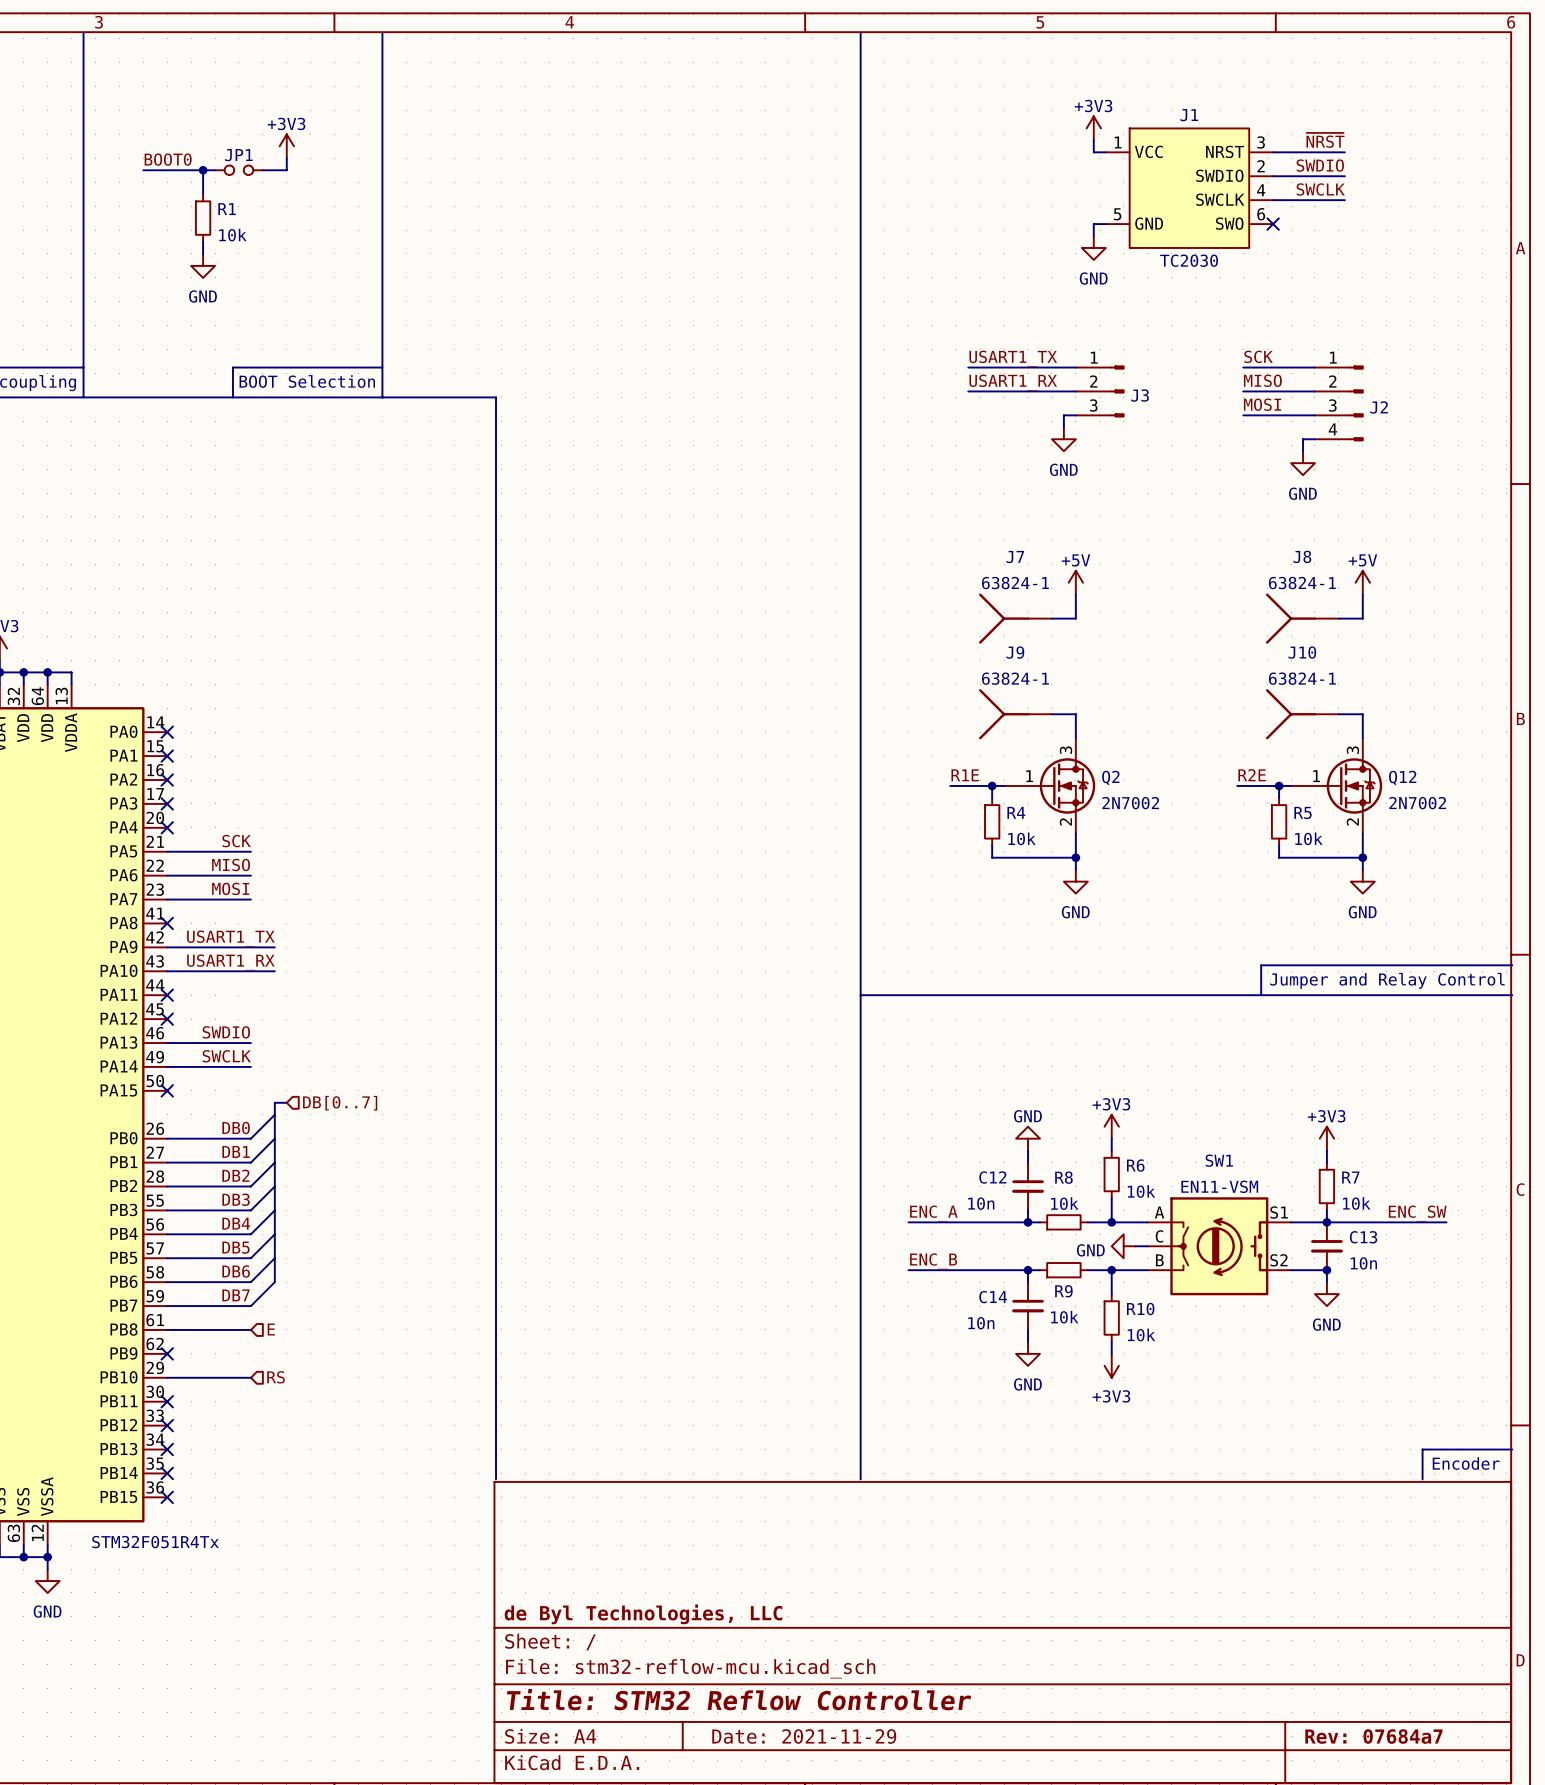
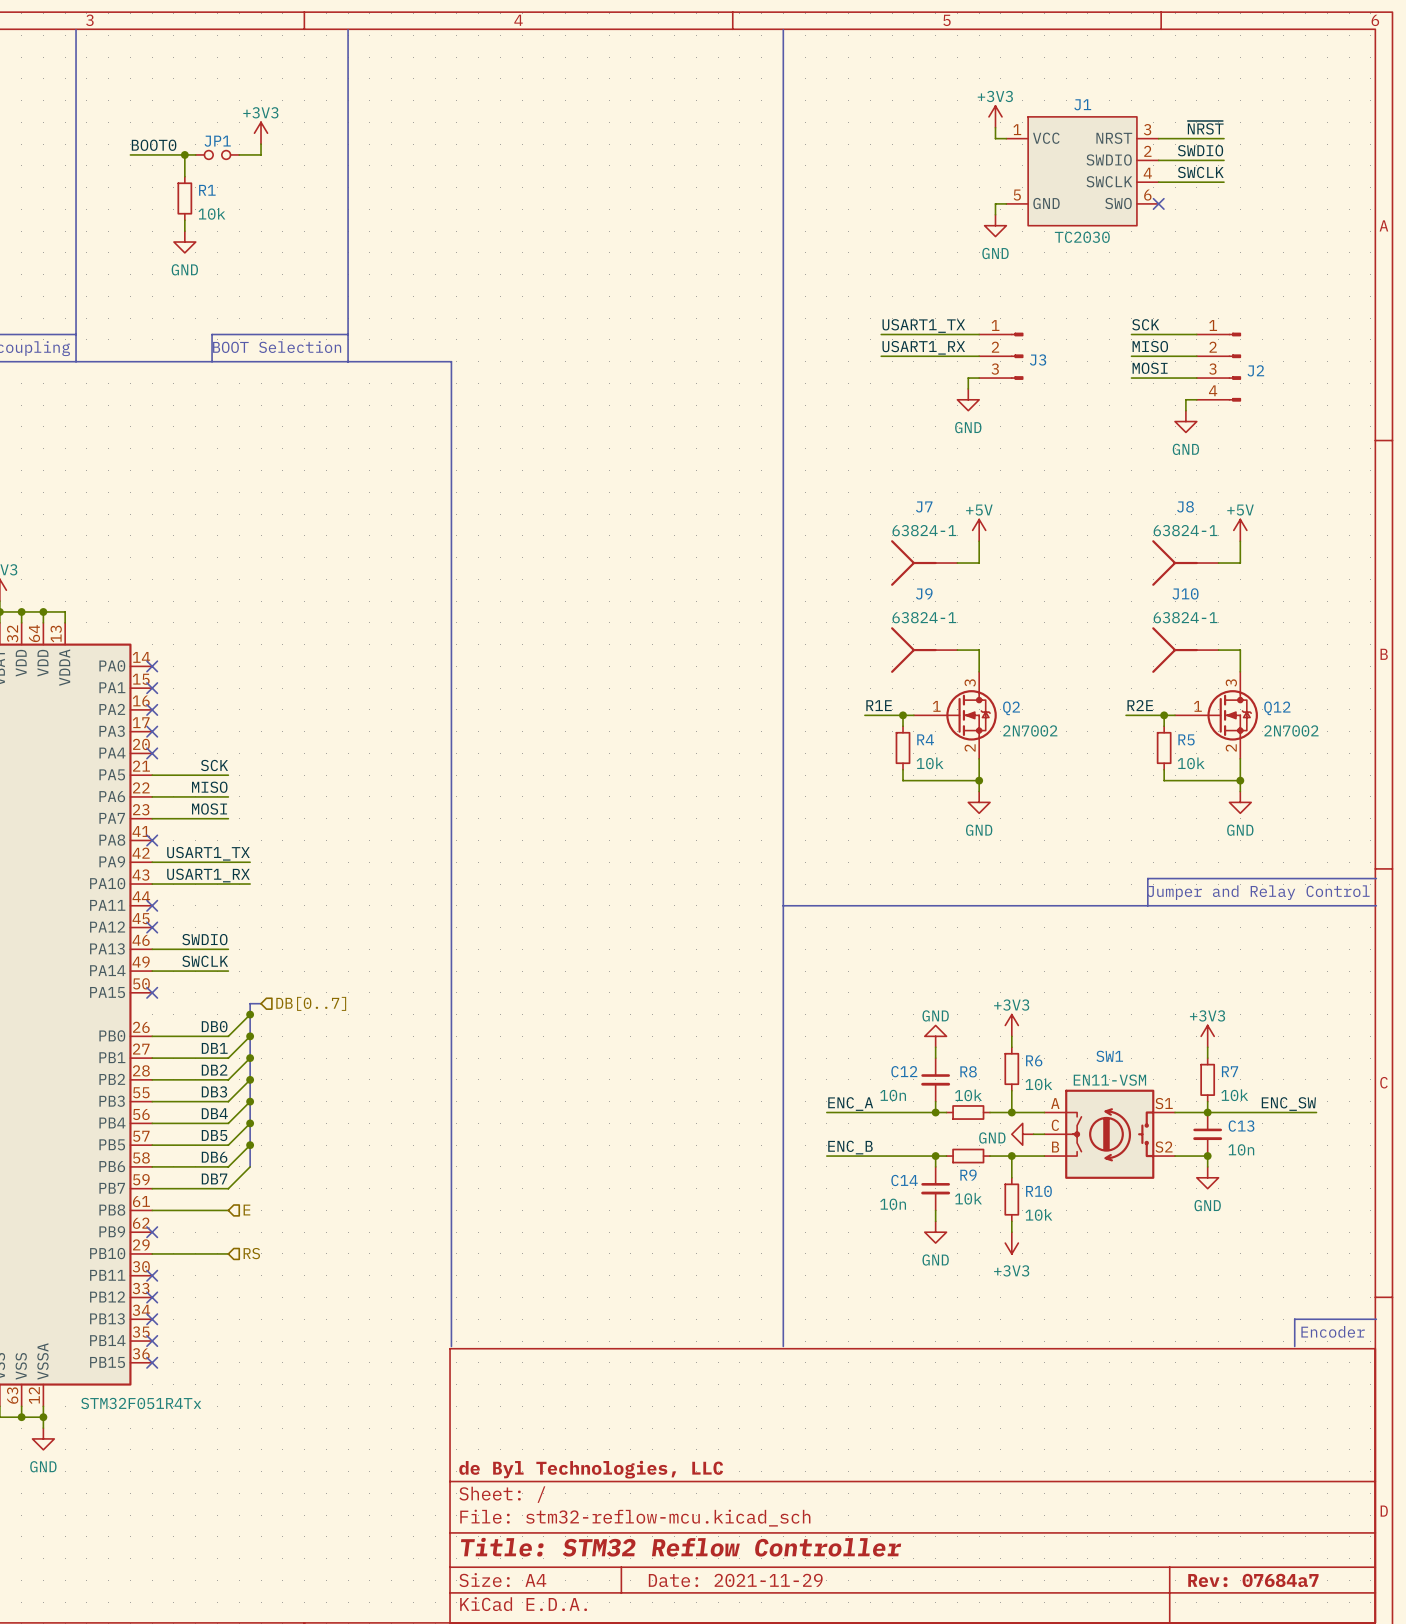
junction: none -> (250, 1014)
junction: none -> (250, 1036)
junction: none -> (250, 1058)
junction: none -> (250, 1079)
junction: none -> (250, 1101)
junction: none -> (250, 1123)
junction: none -> (250, 1145)

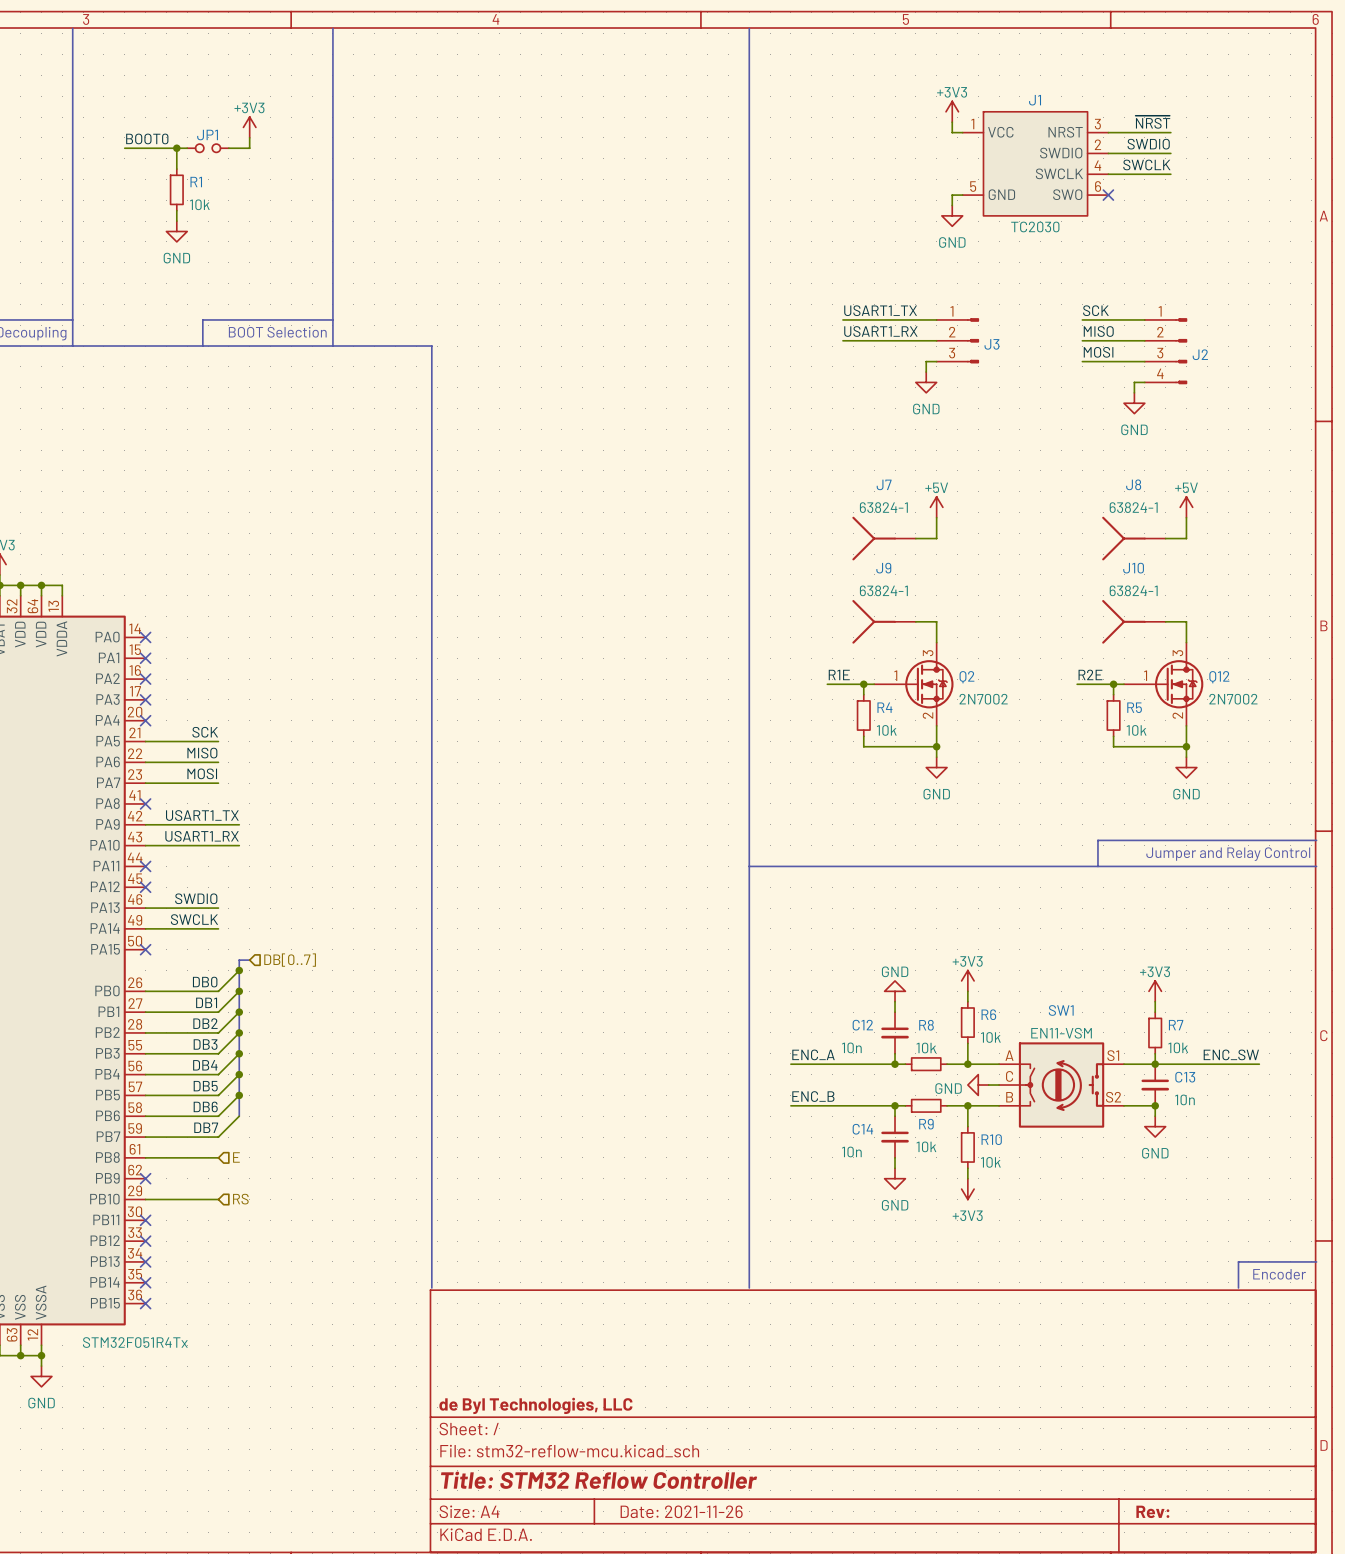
title block: Date: 2021-11-29 (735, 1580) -> Date: 2021-11-26 (681, 1511)
title block: Rev: 07684a7 (1253, 1580) -> Rev: (1152, 1511)

